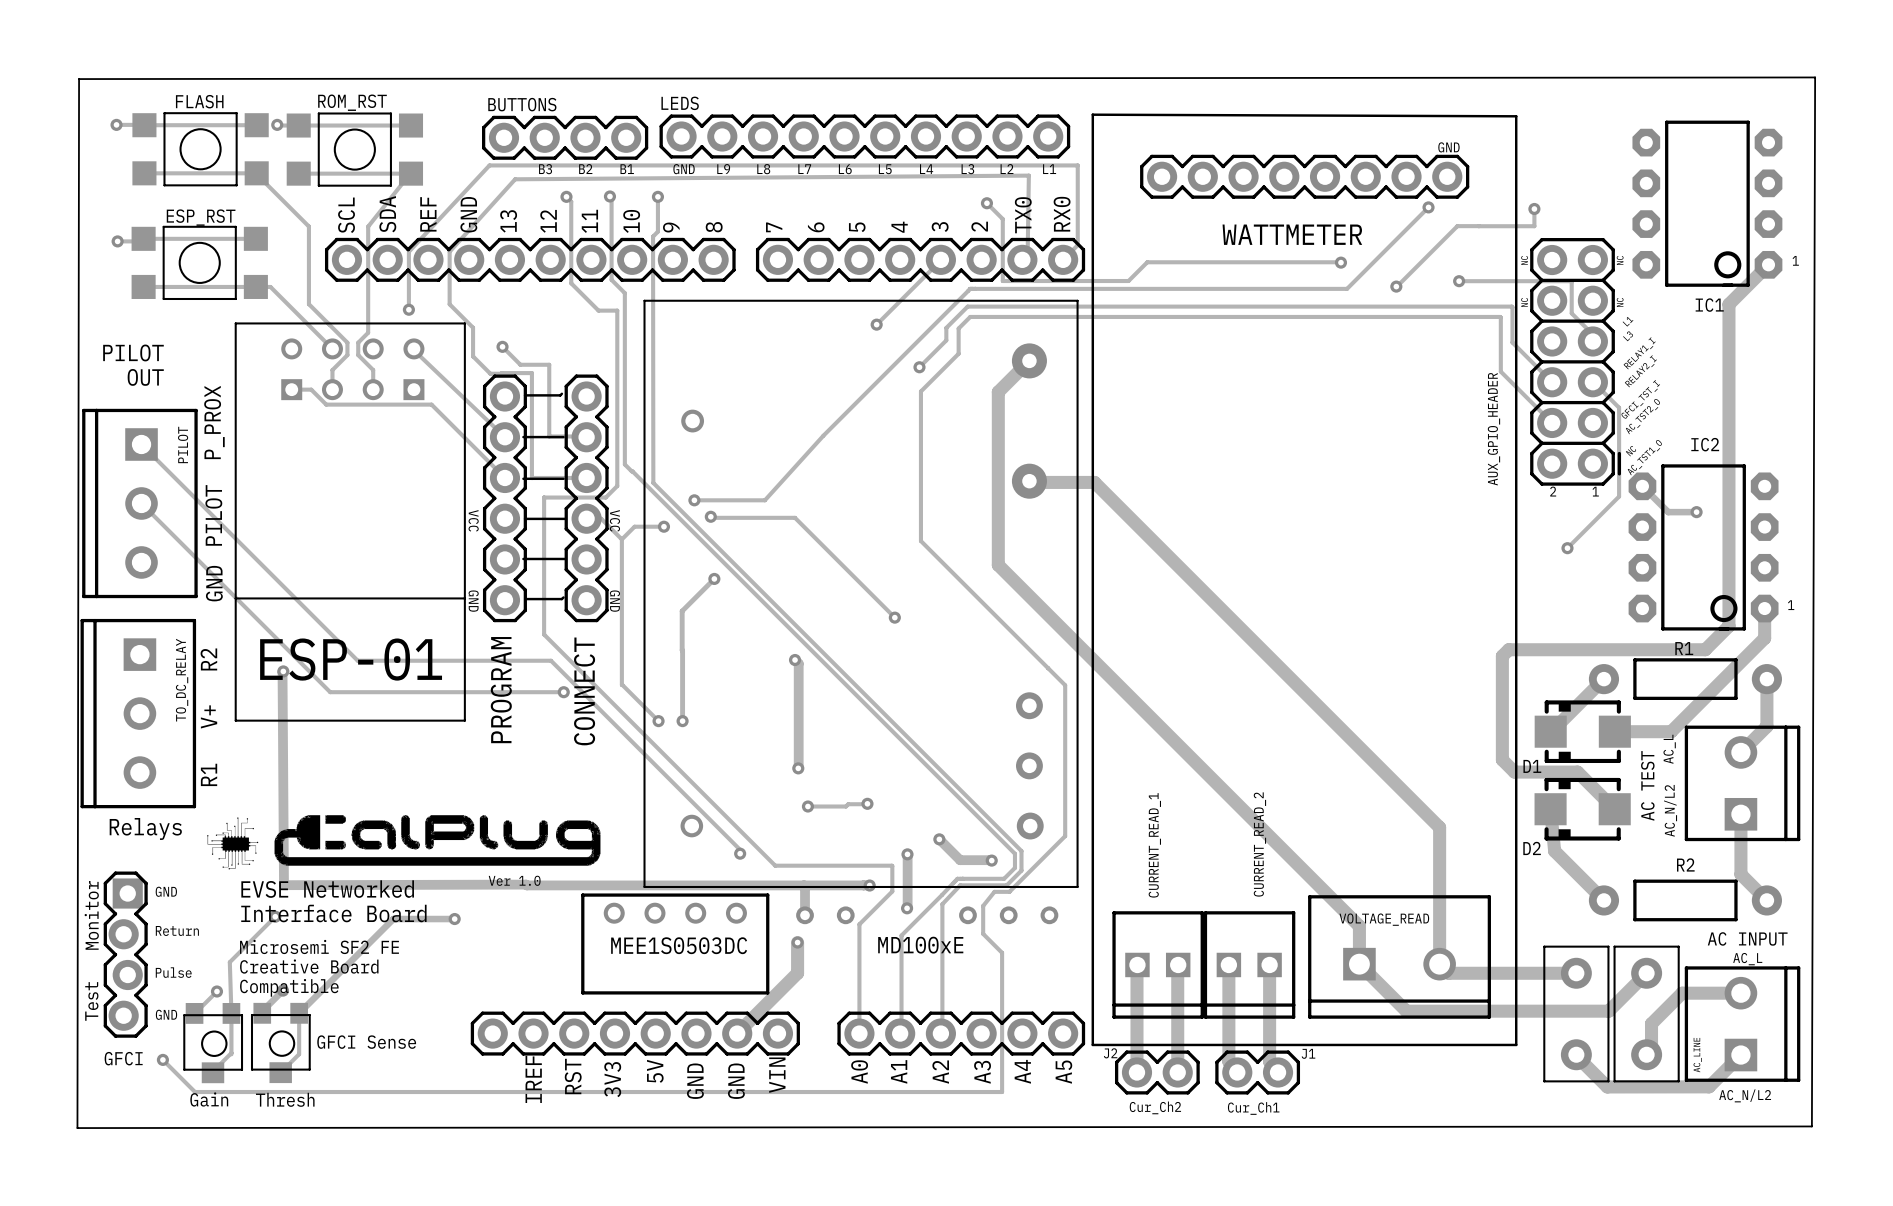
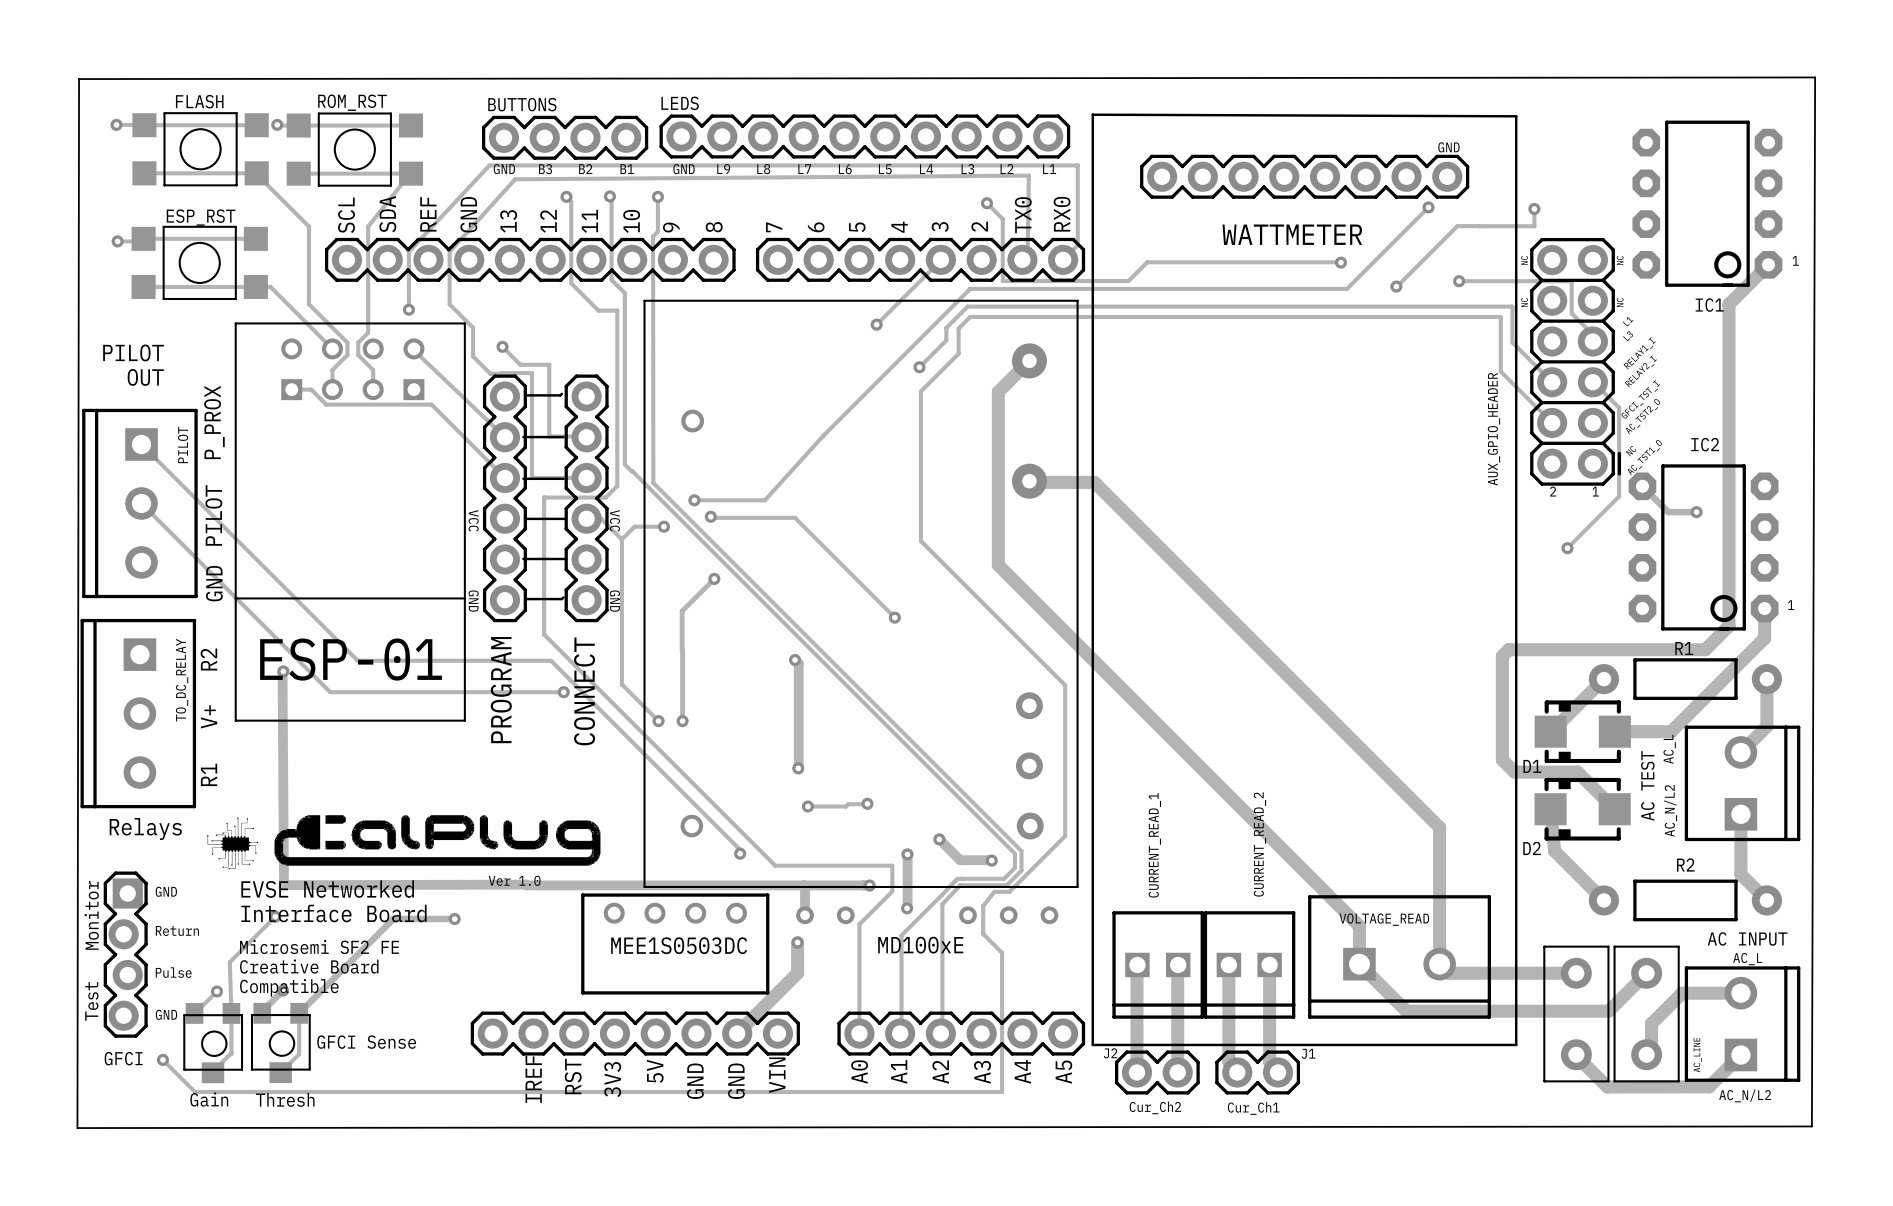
text: none -> GND (504, 169)

